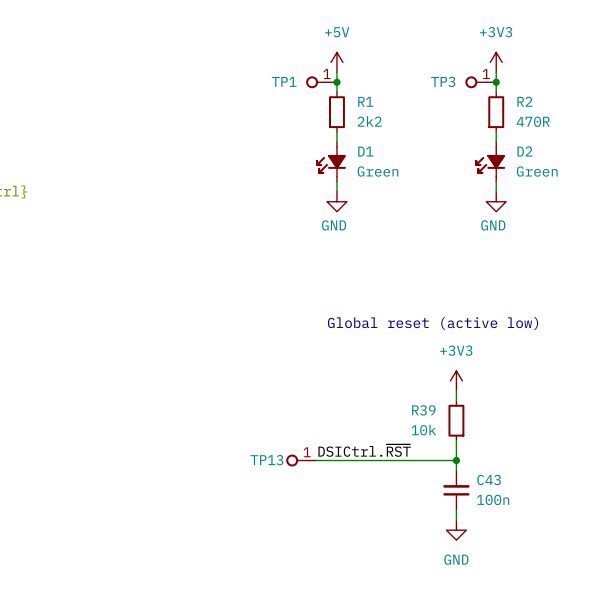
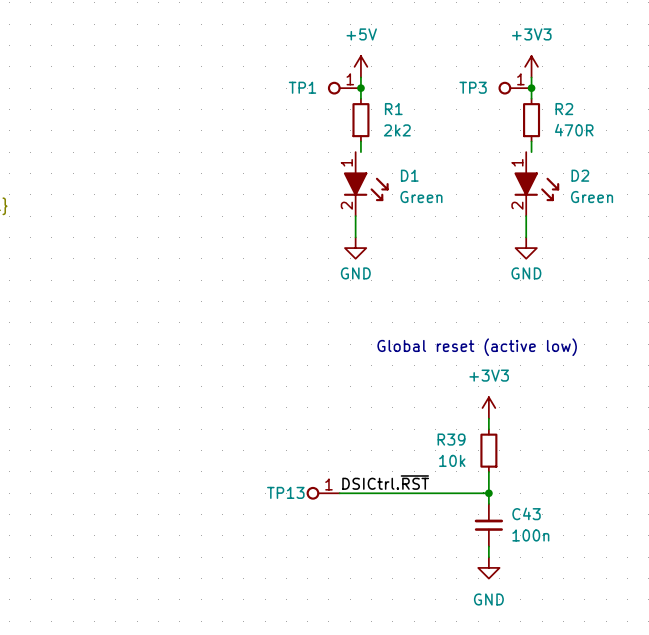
D1 symbol: [316, 142, 346, 182] -> [343, 152, 389, 217]
D2 symbol: [475, 142, 506, 182] -> [514, 152, 560, 217]
wire: (336, 181) (336, 191) -> none
wire: (496, 181) (496, 191) -> none
wire: none -> (355, 216) (355, 237)
power symbol position: GND (336, 201) -> GND (355, 248)
wire: none -> (526, 216) (526, 237)
power symbol position: GND (496, 201) -> GND (526, 248)

